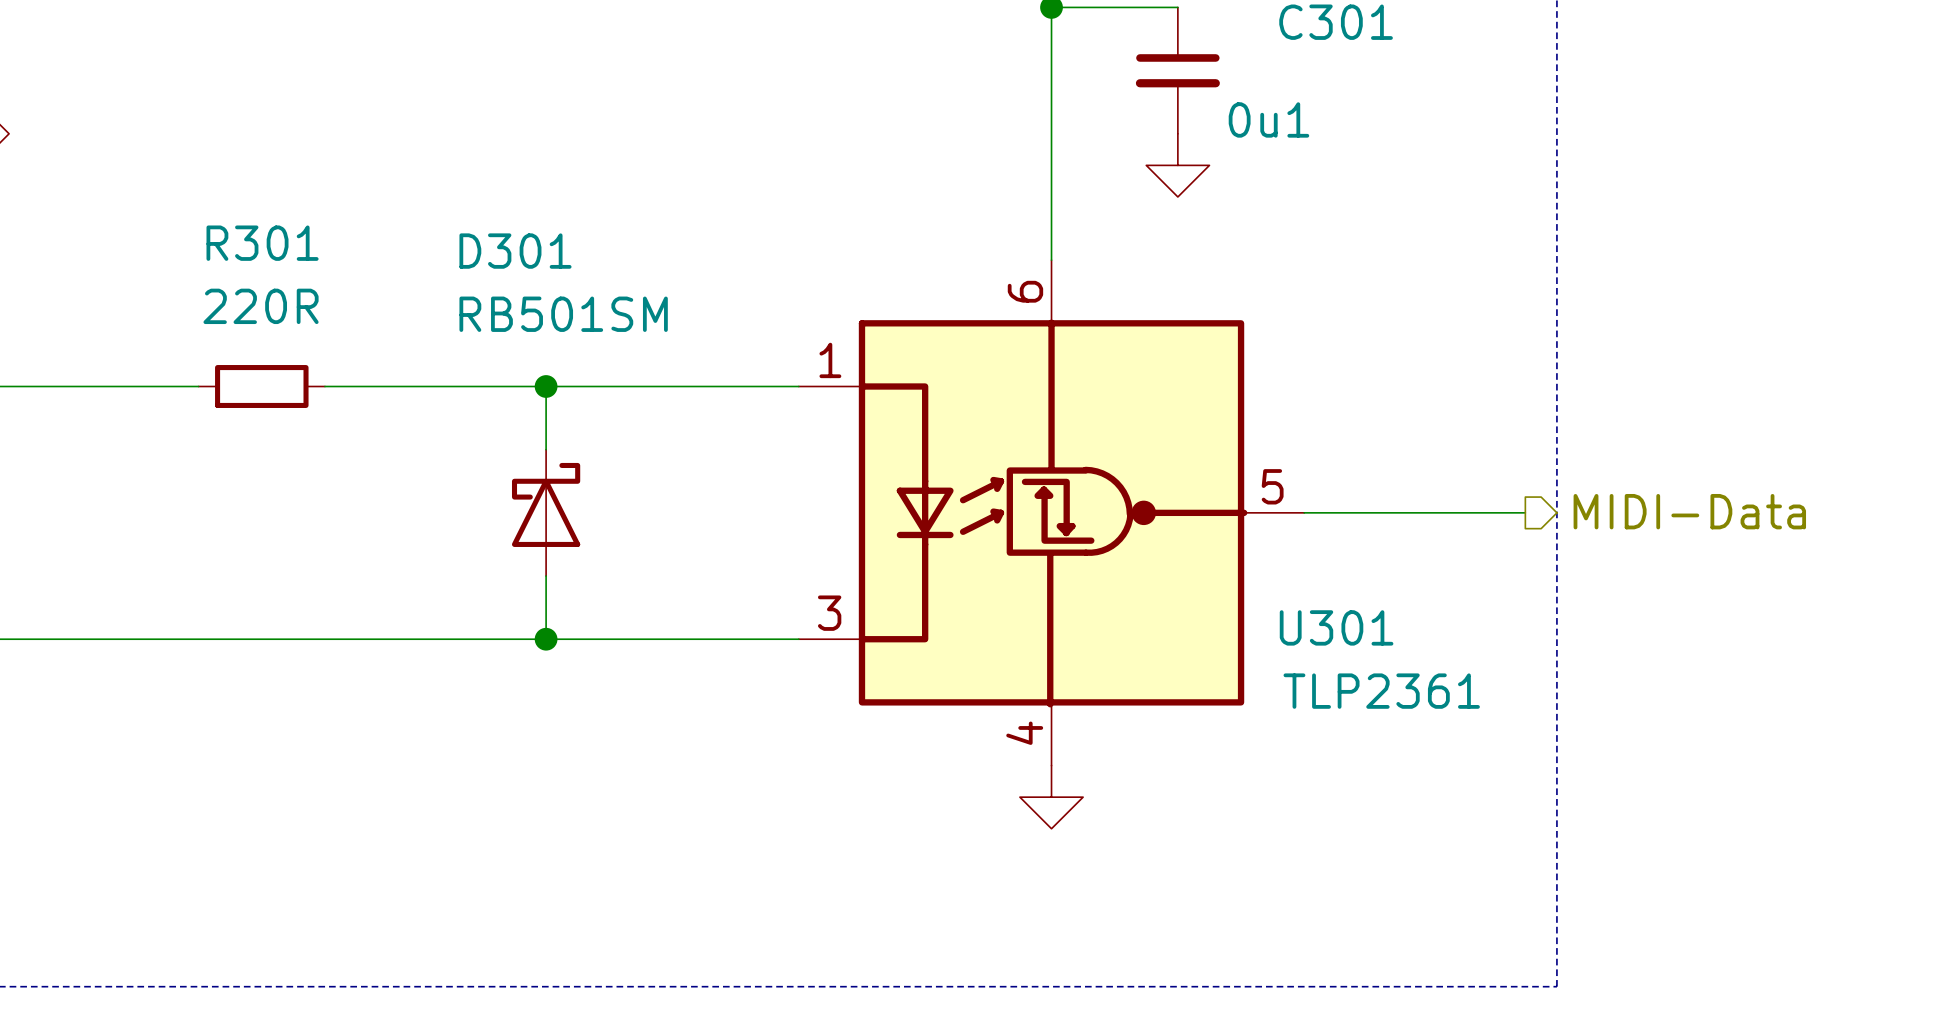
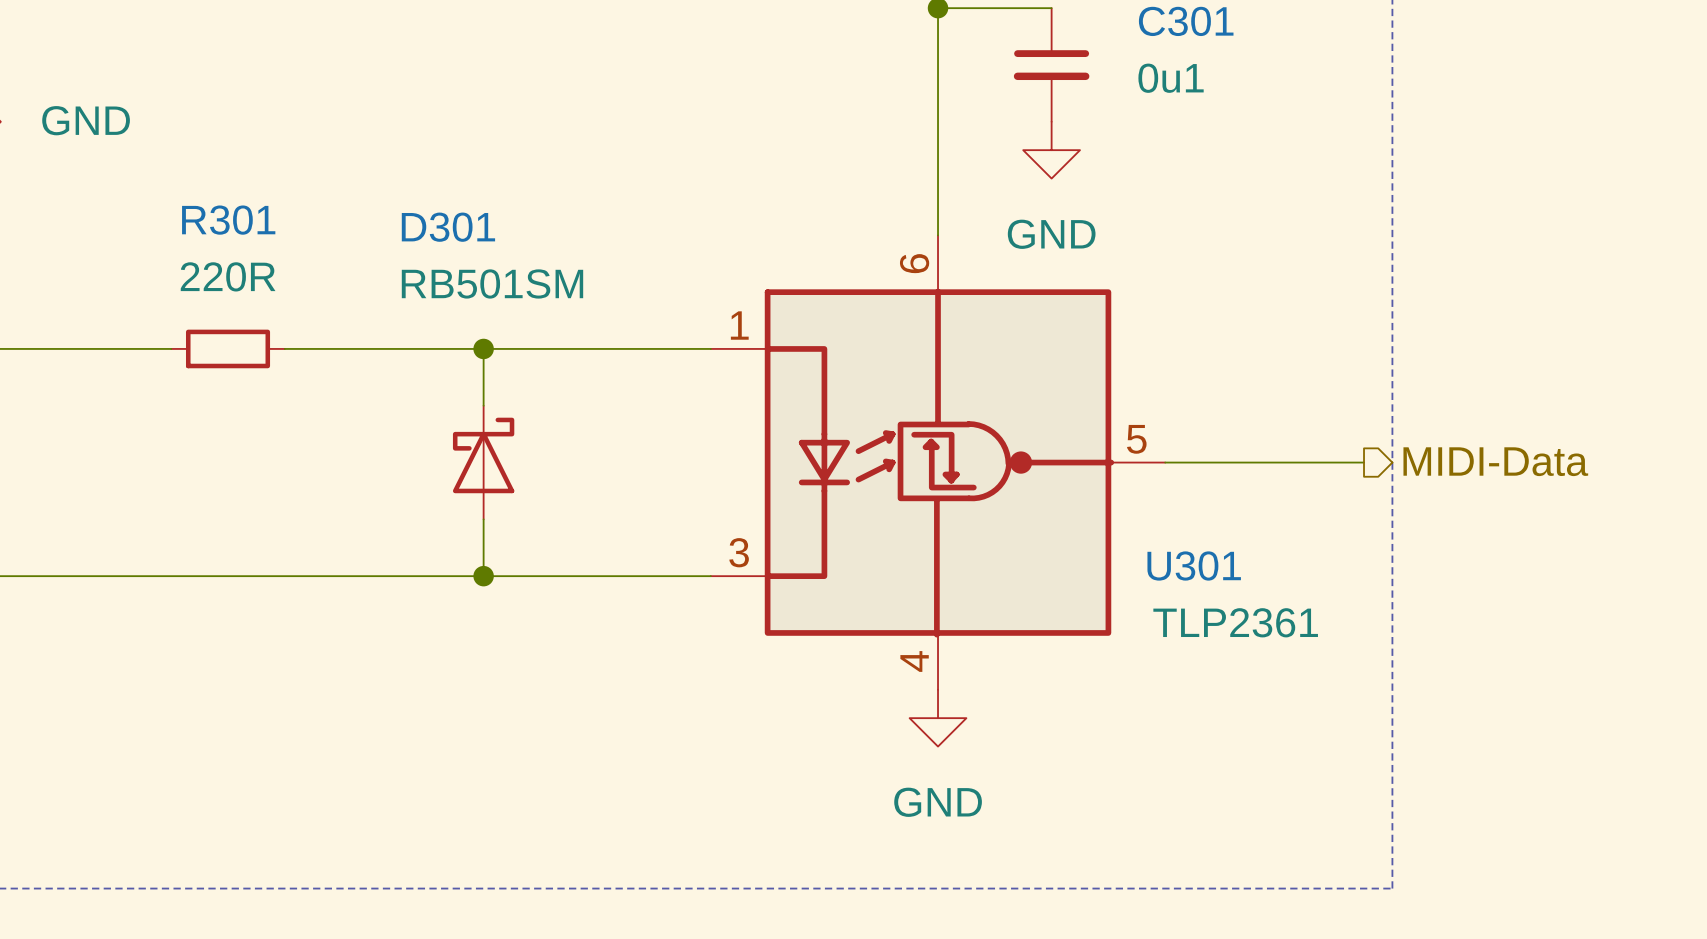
C301 value position: 0u1 (1268, 119) -> 0u1 (1171, 78)
power symbol text: none -> GND (86, 120)
power symbol text: none -> GND (1051, 234)
power symbol text: none -> GND (938, 802)

